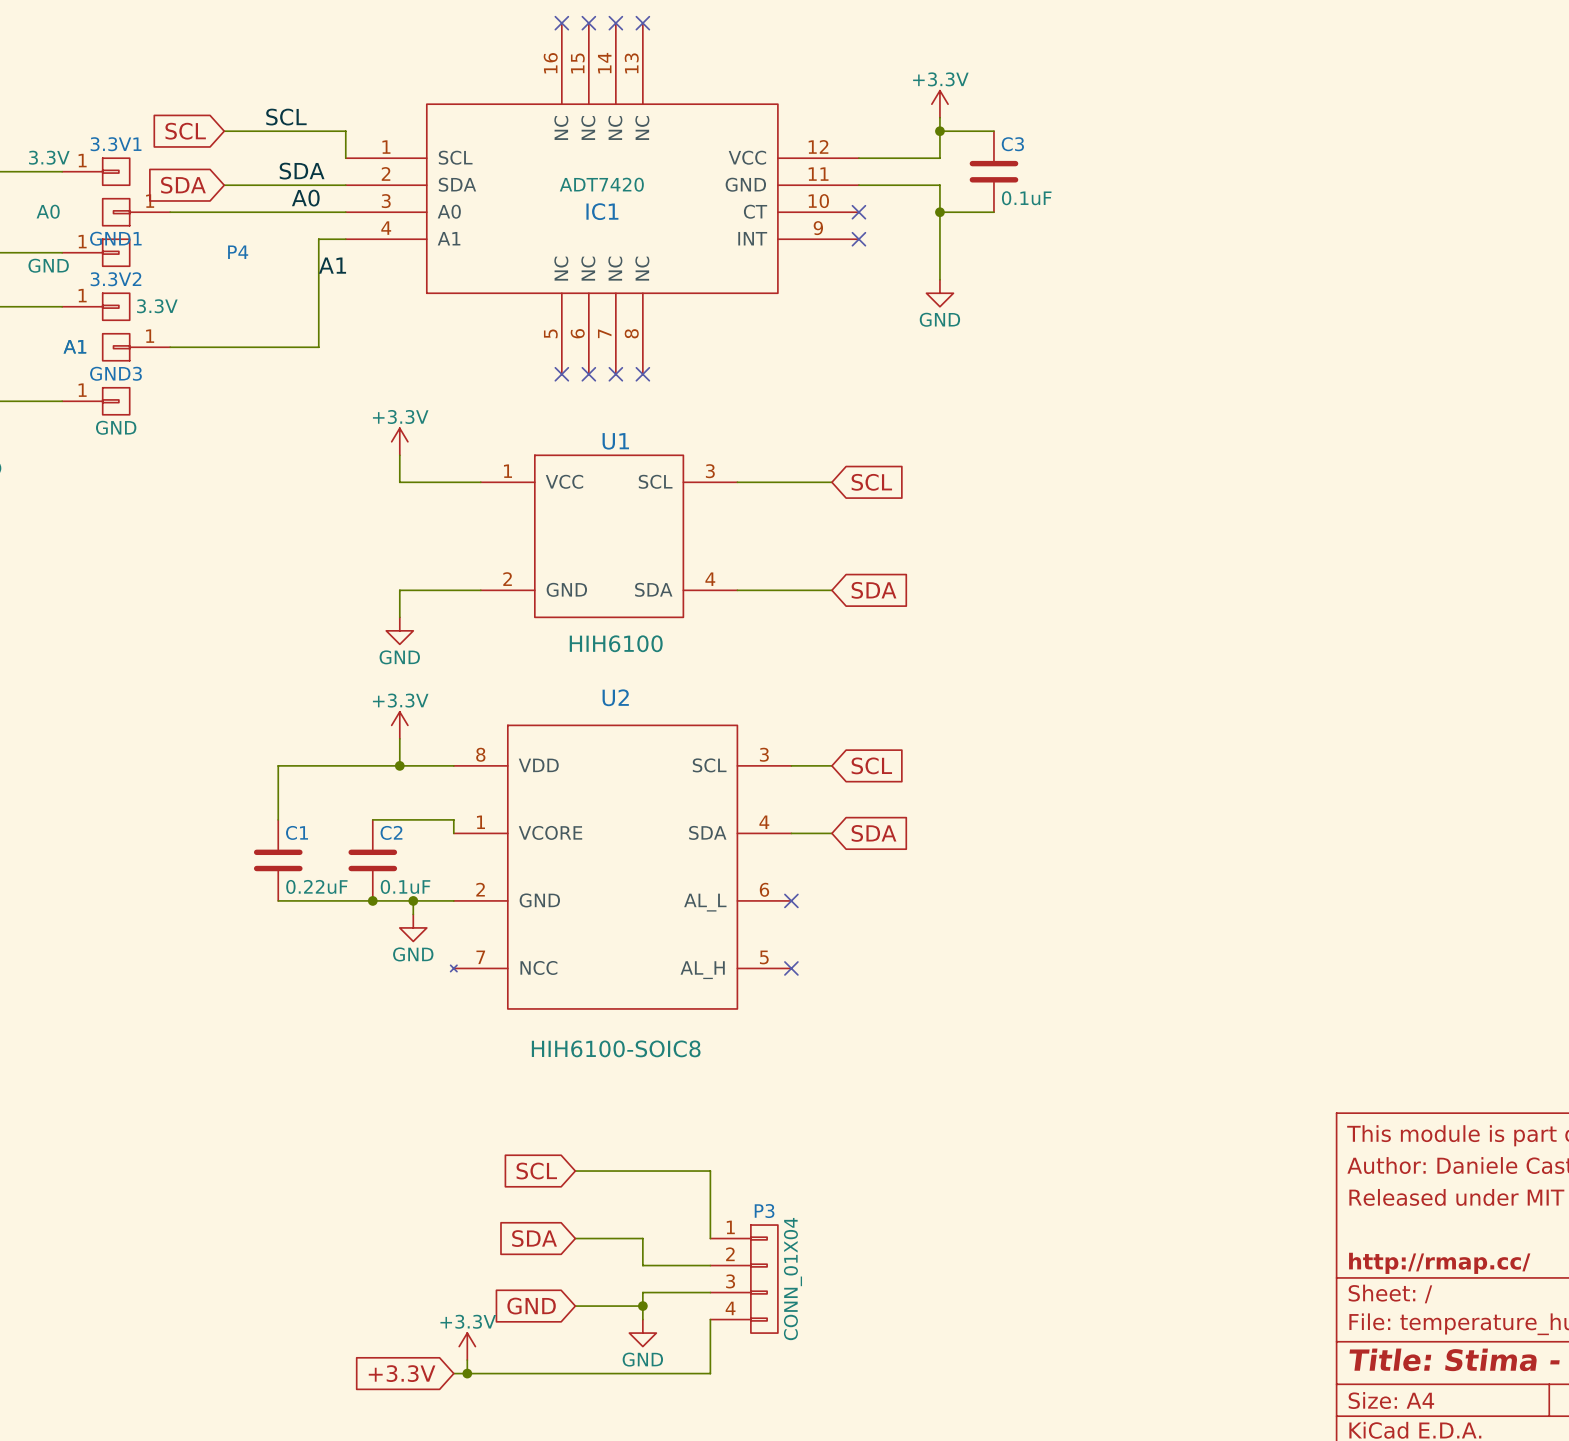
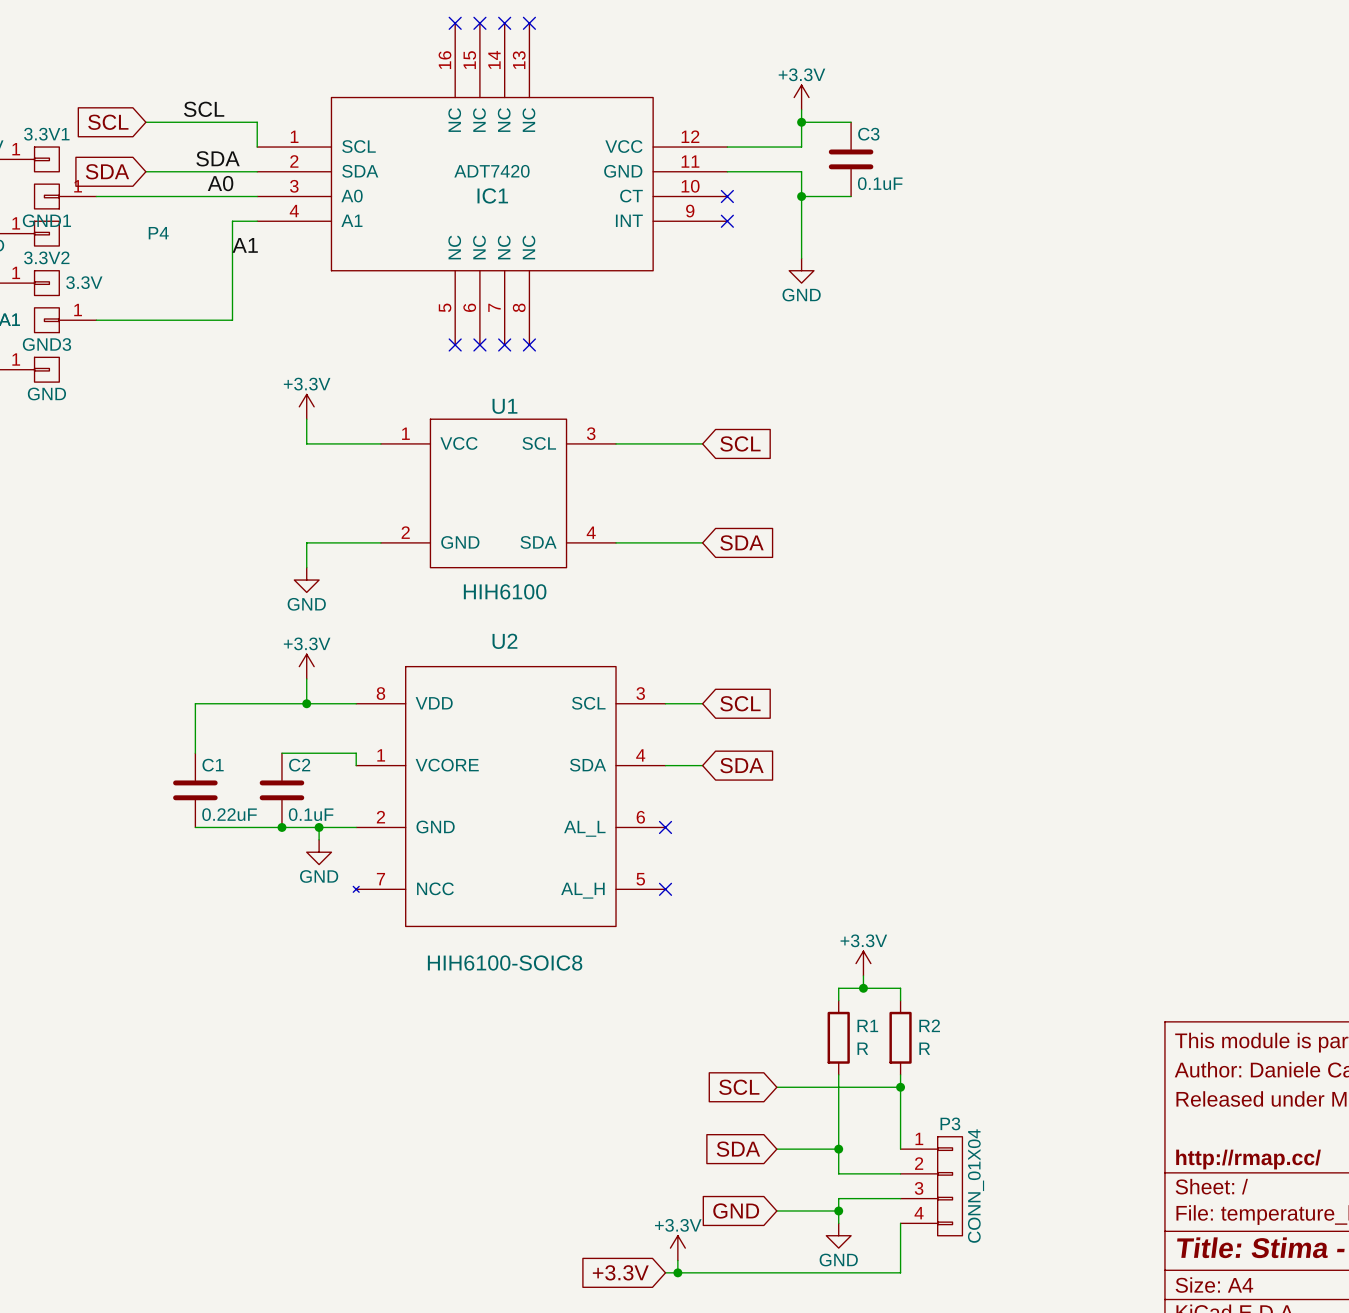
power symbol: none -> +3.3V (863, 963)
wire: none -> (863, 975) (863, 988)
junction: none -> (863, 988)
wire: none -> (838, 1000) (838, 988) (900, 988) (900, 1000)
R1: none -> R (838, 1037)
R2: none -> R (900, 1037)
global label: SCL (536, 1171) -> none
wire: (575, 1171) (710, 1171) (710, 1238) -> none
wire: none -> (838, 1074) (838, 1173) (900, 1173)
wire: none -> (900, 1074) (900, 1149)
global label: none -> SCL (739, 1087)
wire: none -> (776, 1087) (900, 1087)
junction: none -> (900, 1087)
global label: SDA (534, 1238) -> none
wire: (575, 1238) (642, 1238) (642, 1265) (710, 1265) -> none
global label: none -> SDA (738, 1149)
wire: none -> (776, 1149) (838, 1149)
junction: none -> (838, 1149)
P3 position: (744, 1279) -> (931, 1186)
wire: (710, 1292) (642, 1292) (642, 1319) -> none
global label: GND (531, 1306) -> none
wire: (575, 1306) (642, 1306) -> none
junction: (642, 1306) -> none
wire: none -> (900, 1198) (838, 1198) (838, 1223)
wire: (710, 1319) (710, 1373) (453, 1373) -> none
global label: none -> GND (736, 1210)
wire: none -> (776, 1210) (838, 1210)
junction: none -> (838, 1210)
power symbol: GND (642, 1333) -> none
wire: none -> (900, 1223) (900, 1272) (665, 1272)
power symbol: +3.3V (467, 1346) -> none
power symbol: none -> GND (838, 1235)
wire: (467, 1360) (467, 1373) -> none
power symbol: none -> +3.3V (677, 1248)
global label: +3.3V (402, 1373) -> none
junction: (467, 1373) -> none
wire: none -> (677, 1260) (677, 1272)
global label: none -> +3.3V (620, 1272)
junction: none -> (677, 1272)

